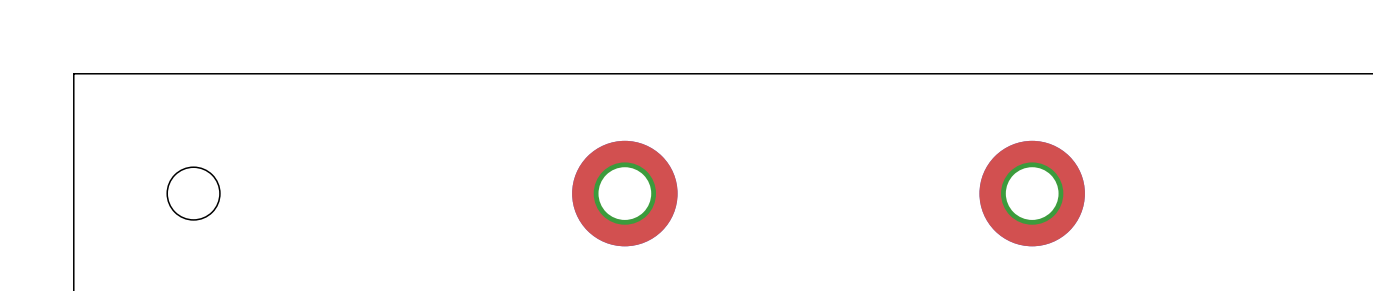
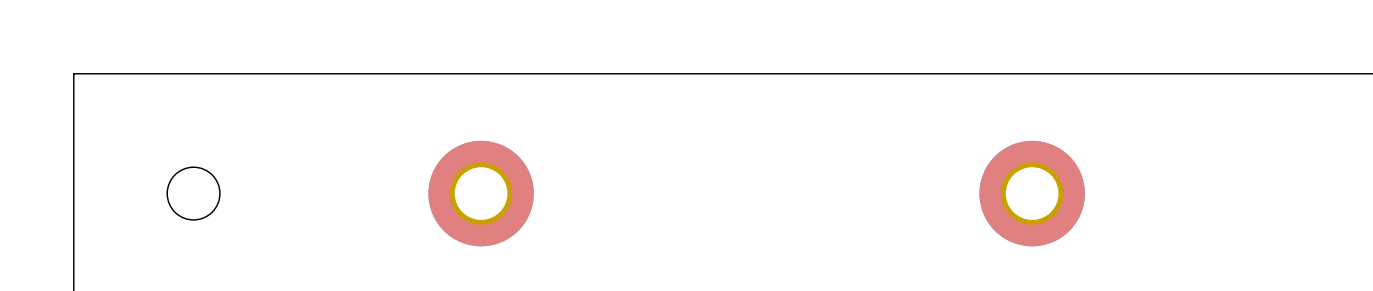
part position: (624, 193) -> (481, 193)

